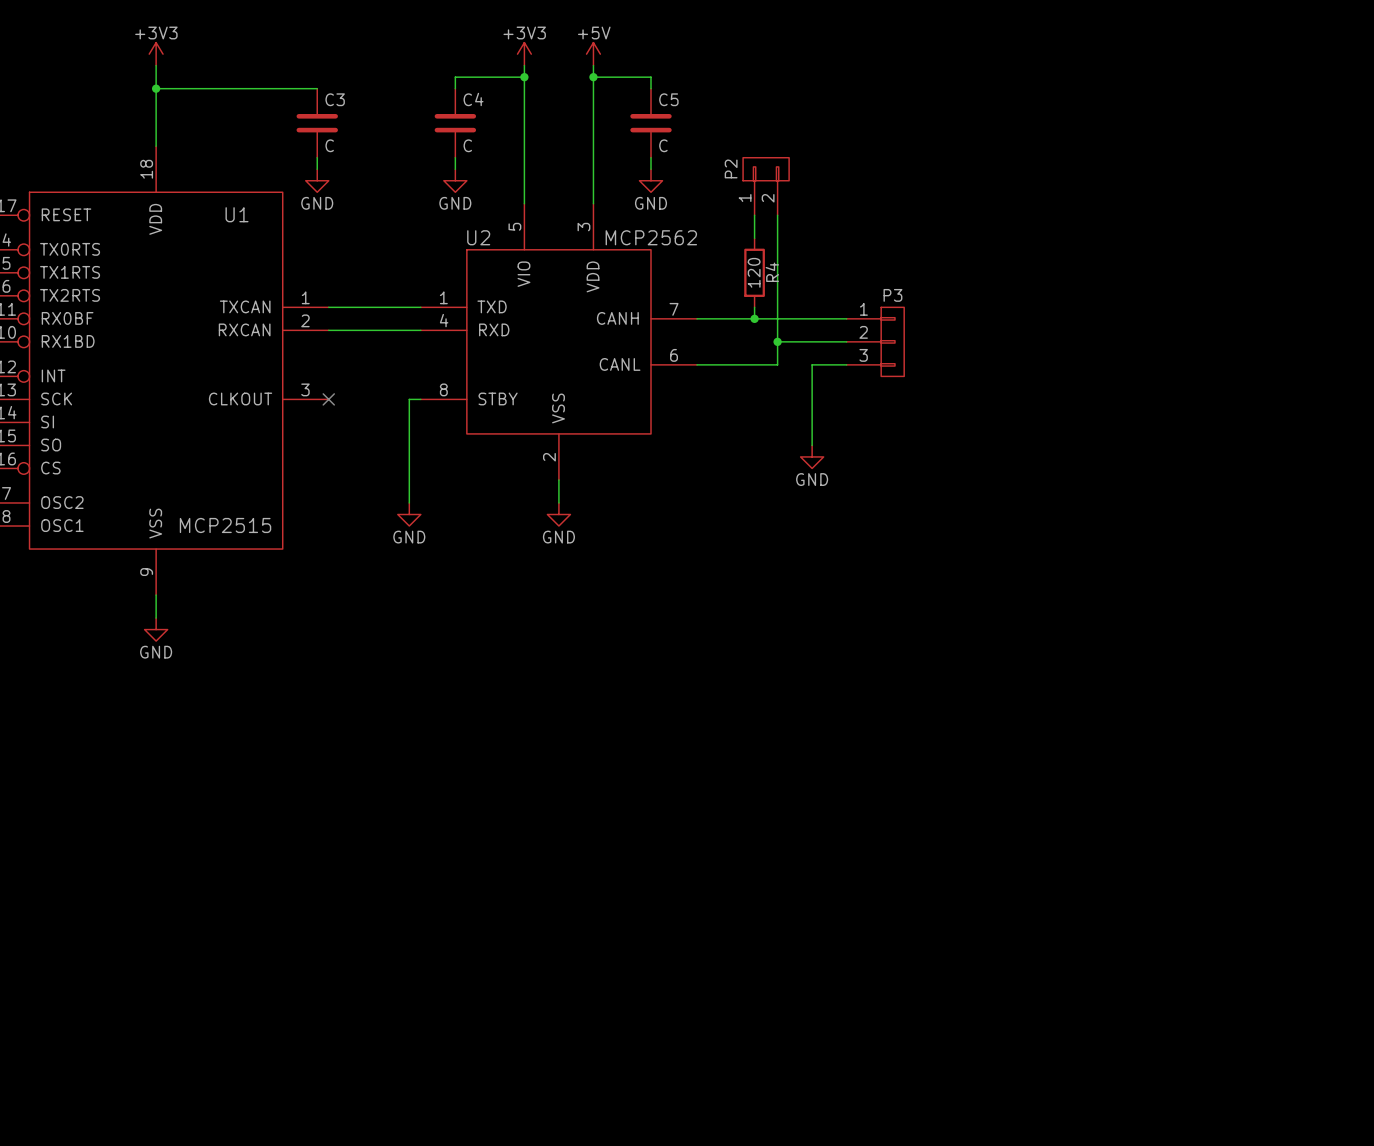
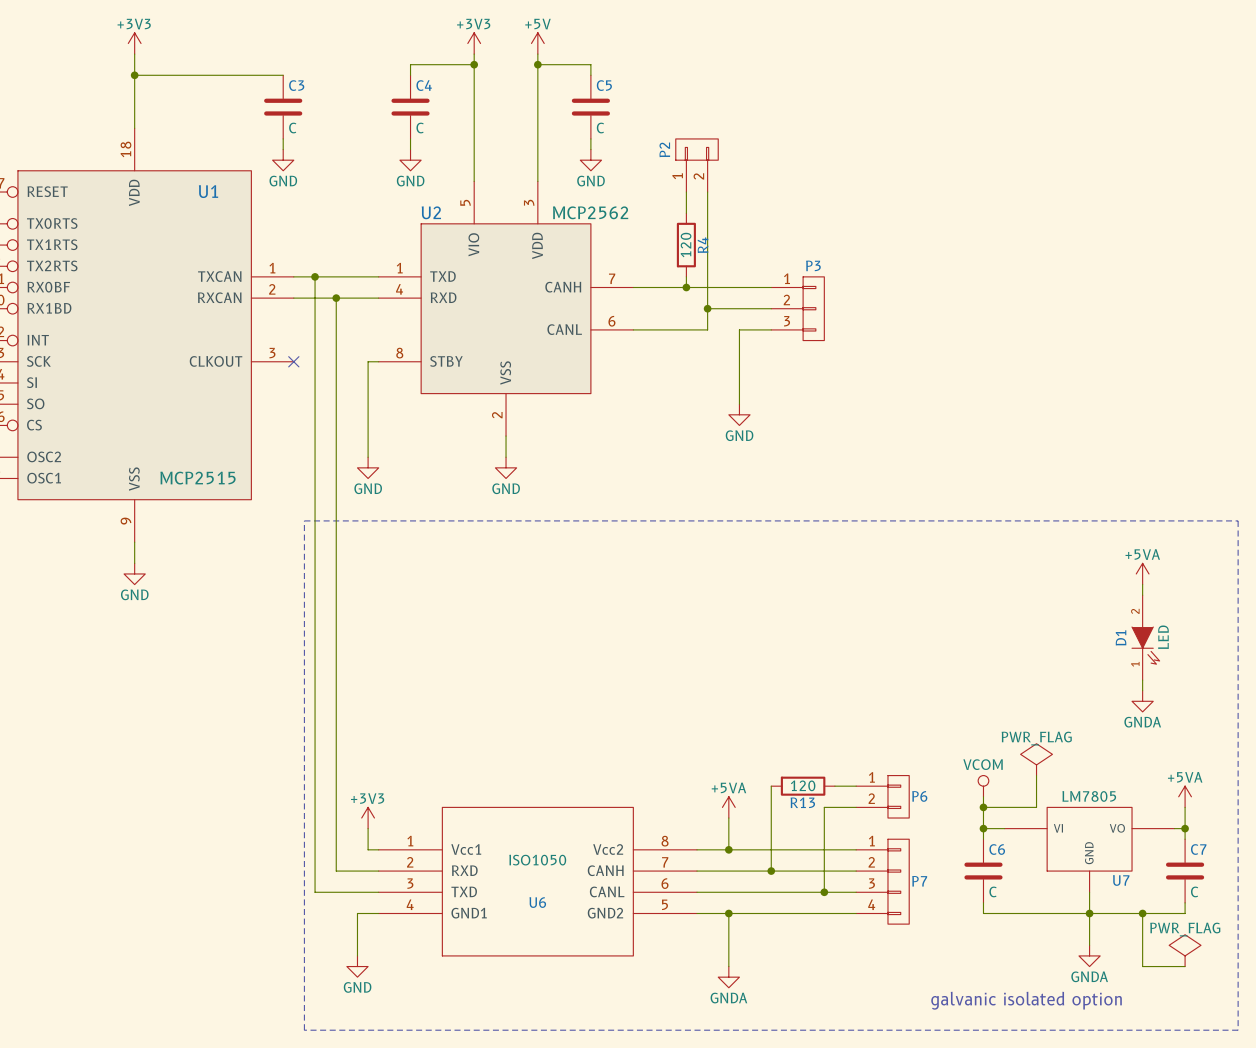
wire: none -> (315, 276) (315, 892) (378, 892)
junction: none -> (315, 276)
wire: none -> (336, 298) (336, 871) (378, 871)
junction: none -> (336, 298)
line: none -> (304, 520) (304, 1030) (1238, 1030) (1238, 520) (304, 520)
power symbol: none -> +5VA (1142, 573)
wire: none -> (1142, 584) (1142, 595)
D1: none -> LED (1145, 637)
wire: none -> (1142, 680) (1142, 690)
power symbol: none -> GNDA (1142, 701)
power symbol: none -> PWR_FLAG (1036, 759)
wire: none -> (1036, 775) (1036, 807) (983, 807)
wire: none -> (771, 786) (771, 871)
R13: none -> 120 (803, 786)
wire: none -> (834, 786) (856, 786)
power symbol: none -> VCOM (983, 786)
P6: none -> (882, 796)
wire: none -> (983, 796) (983, 839)
power symbol: none -> +5VA (1185, 796)
power symbol: none -> +5VA (728, 807)
wire: none -> (856, 807) (824, 807) (824, 892)
junction: none -> (983, 807)
wire: none -> (1185, 807) (1185, 839)
power symbol: none -> +3V3 (368, 818)
wire: none -> (728, 818) (728, 849)
wire: none -> (368, 828) (368, 849) (378, 849)
wire: none -> (983, 828) (1004, 828)
junction: none -> (983, 828)
wire: none -> (1174, 828) (1185, 828)
junction: none -> (1185, 828)
wire: none -> (697, 849) (856, 849)
junction: none -> (728, 849)
U7: none -> LM7805 (1089, 849)
wire: none -> (697, 871) (856, 871)
junction: none -> (771, 871)
C6: none -> C (983, 871)
C7: none -> C (1185, 871)
U6: none -> ISO1050 (537, 881)
P7: none -> (882, 881)
wire: none -> (697, 892) (856, 892)
junction: none -> (824, 892)
wire: none -> (1089, 892) (1089, 945)
wire: none -> (983, 902) (983, 913) (1185, 913) (1185, 902)
wire: none -> (378, 913) (357, 913) (357, 955)
wire: none -> (697, 913) (856, 913)
wire: none -> (728, 913) (728, 966)
junction: none -> (728, 913)
junction: none -> (1089, 913)
wire: none -> (1142, 913) (1142, 966) (1185, 966)
junction: none -> (1142, 913)
power symbol: none -> PWR_FLAG (1185, 950)
power symbol: none -> GNDA (1089, 955)
power symbol: none -> GND (357, 966)
power symbol: none -> GNDA (728, 977)
text: none -> galvanic isolated option (1026, 1000)

